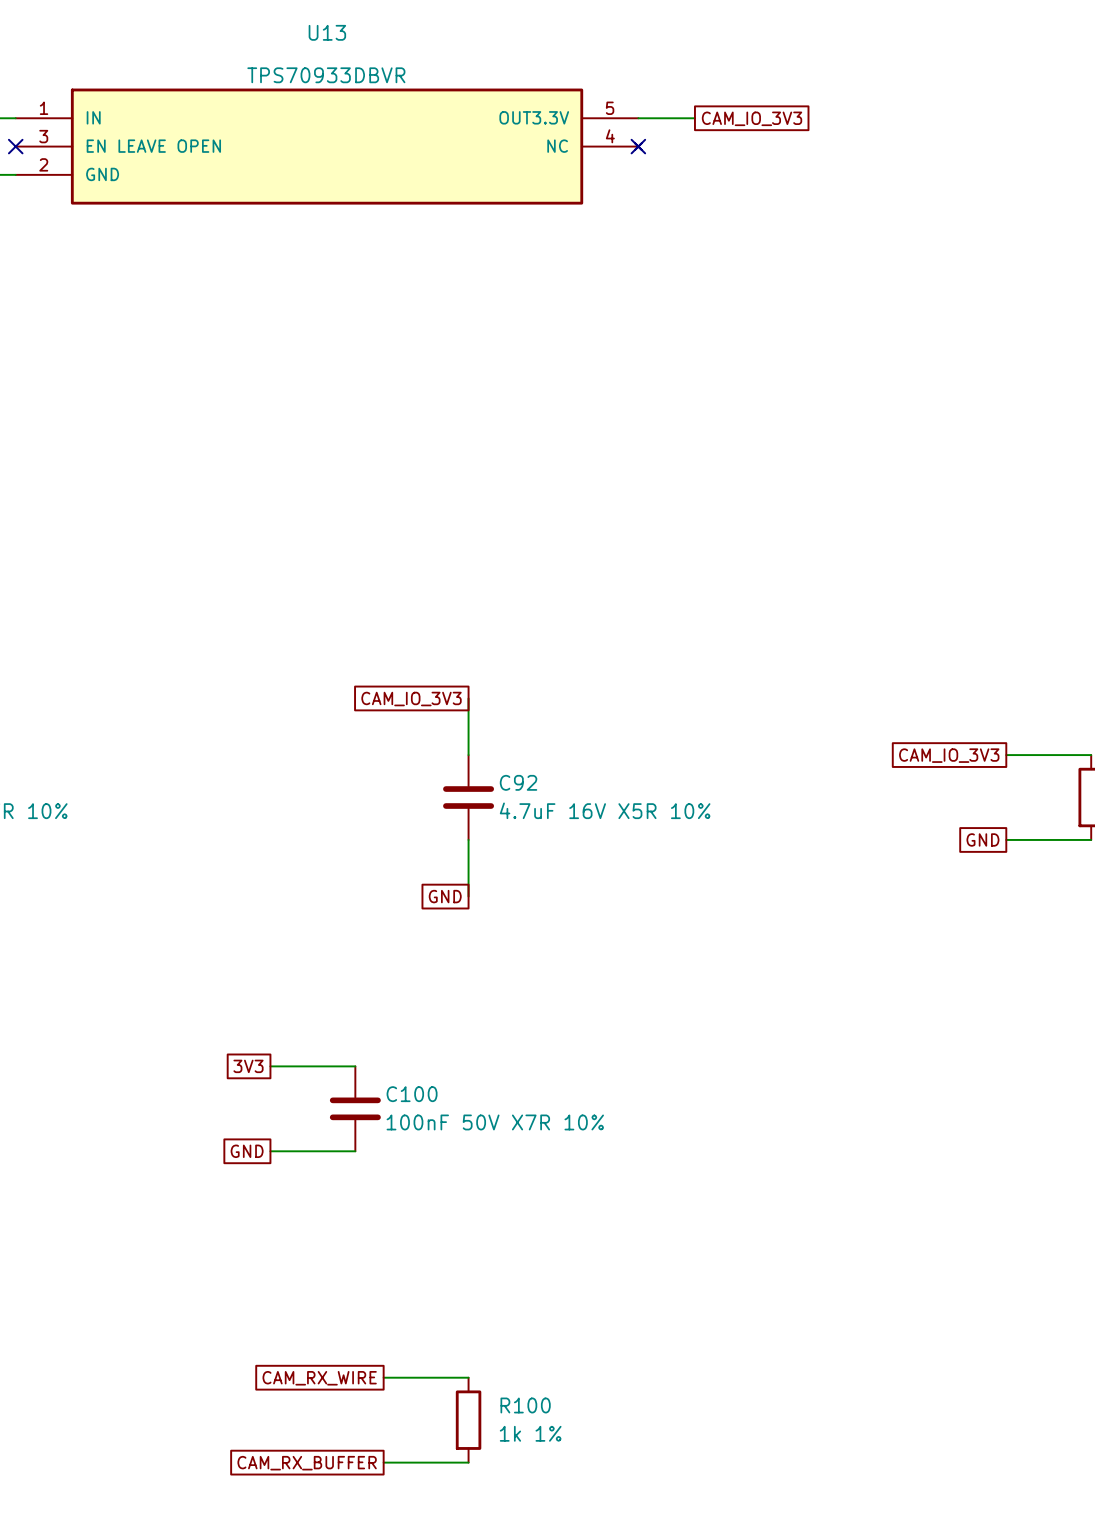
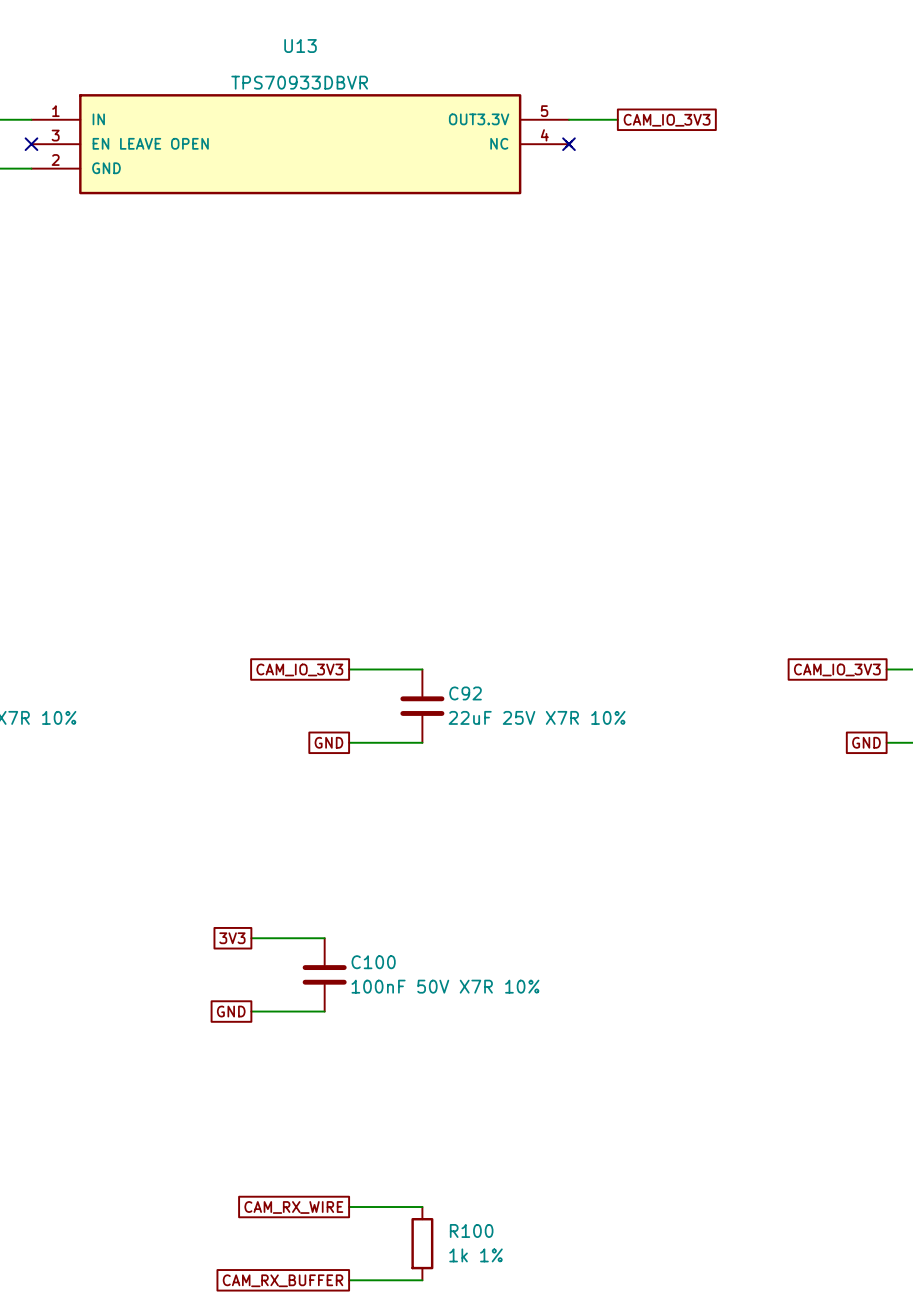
wire: (468, 698) (468, 755) -> (349, 669) (422, 669)
global label position: CAM_IO_3V3 (411, 699) -> CAM_IO_3V3 (299, 669)
C92 value: 4.7uF 16V X5R 10% (605, 810) -> 22uF 25V X7R 10% (537, 717)
wire: (468, 839) (468, 896) -> (422, 742) (349, 742)
global label position: GND (445, 896) -> GND (328, 742)

